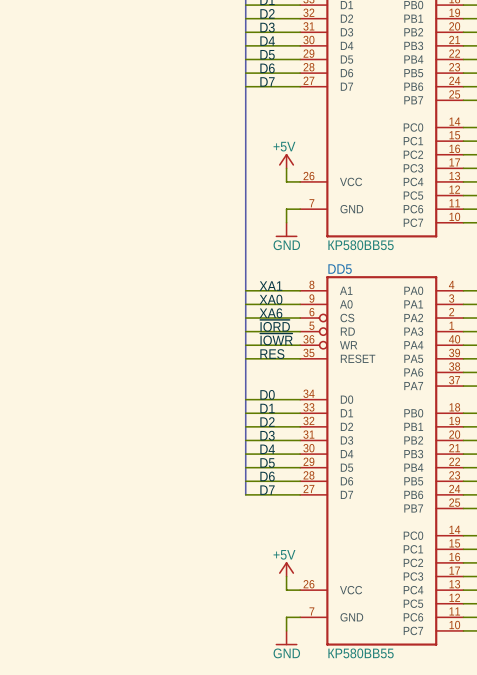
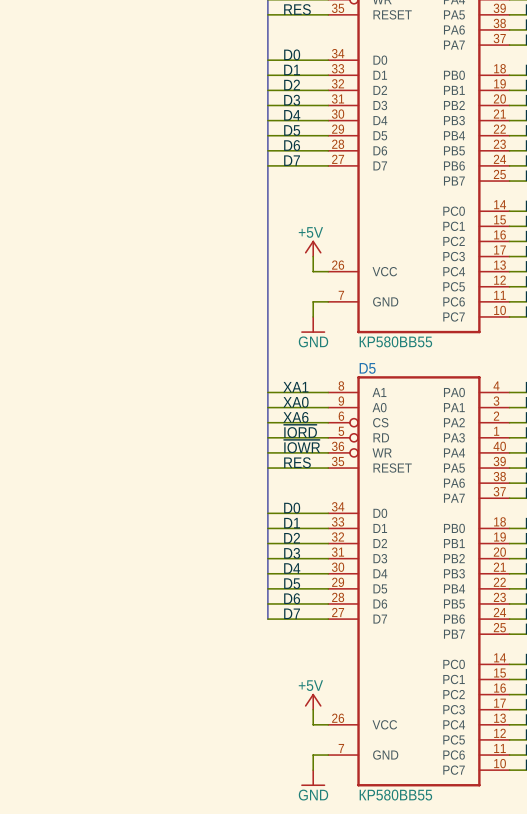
DD5 name: DD5 (340, 269) -> D5 (367, 368)

